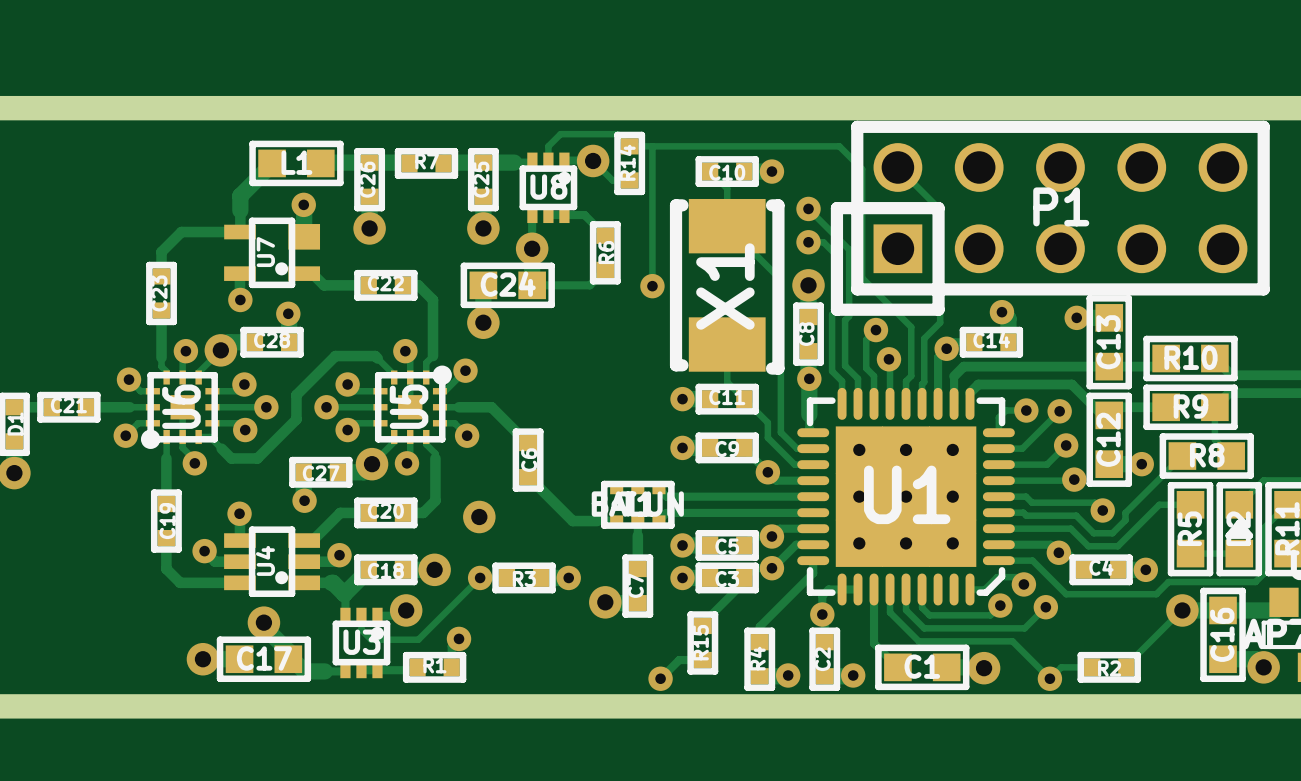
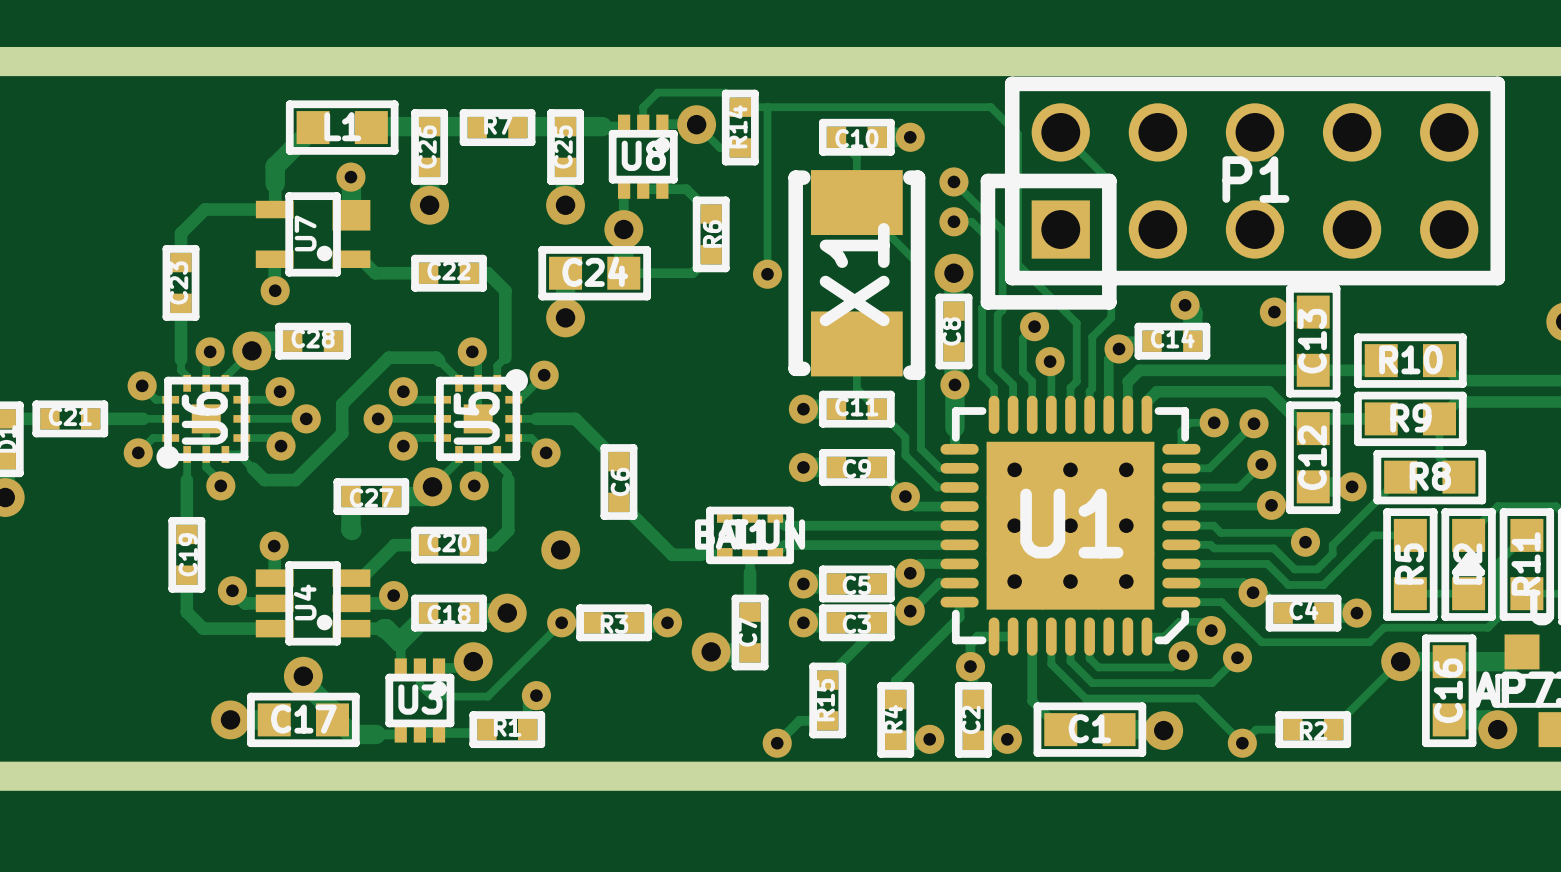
via: (288, 313) -> none
via: (304, 500) -> none

